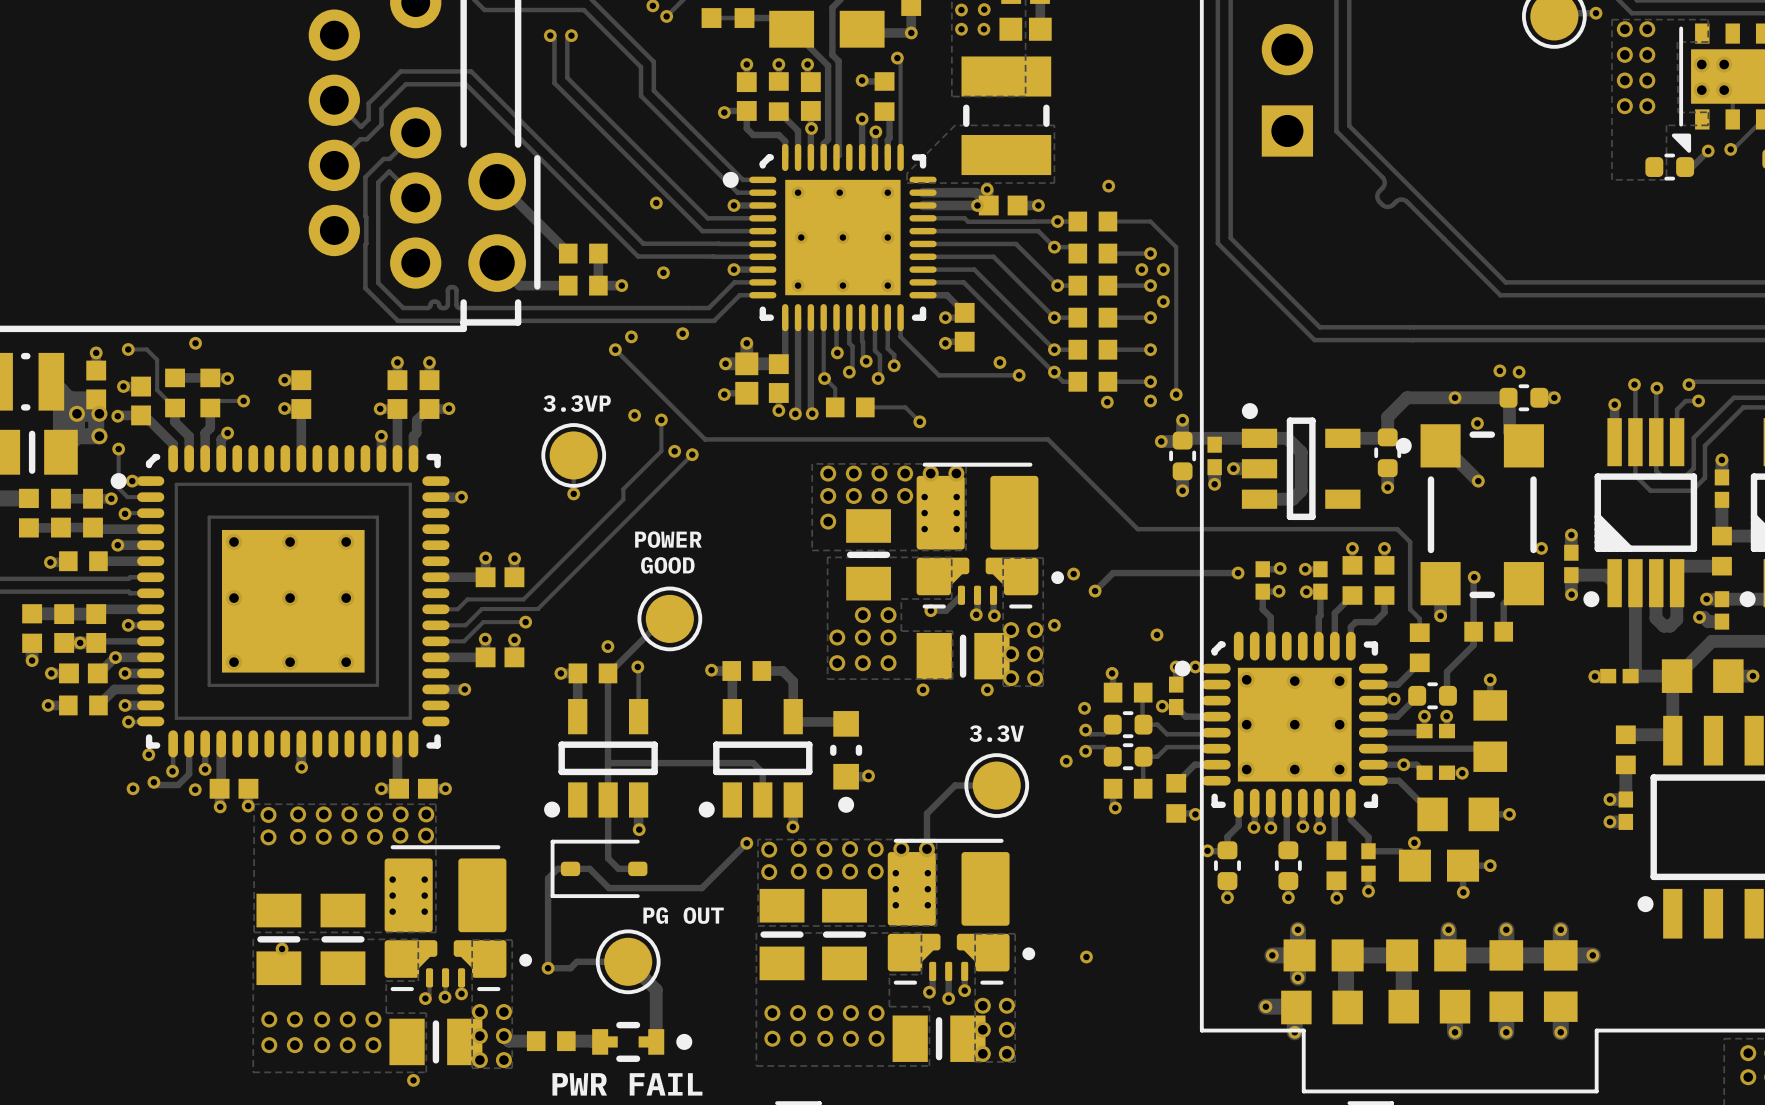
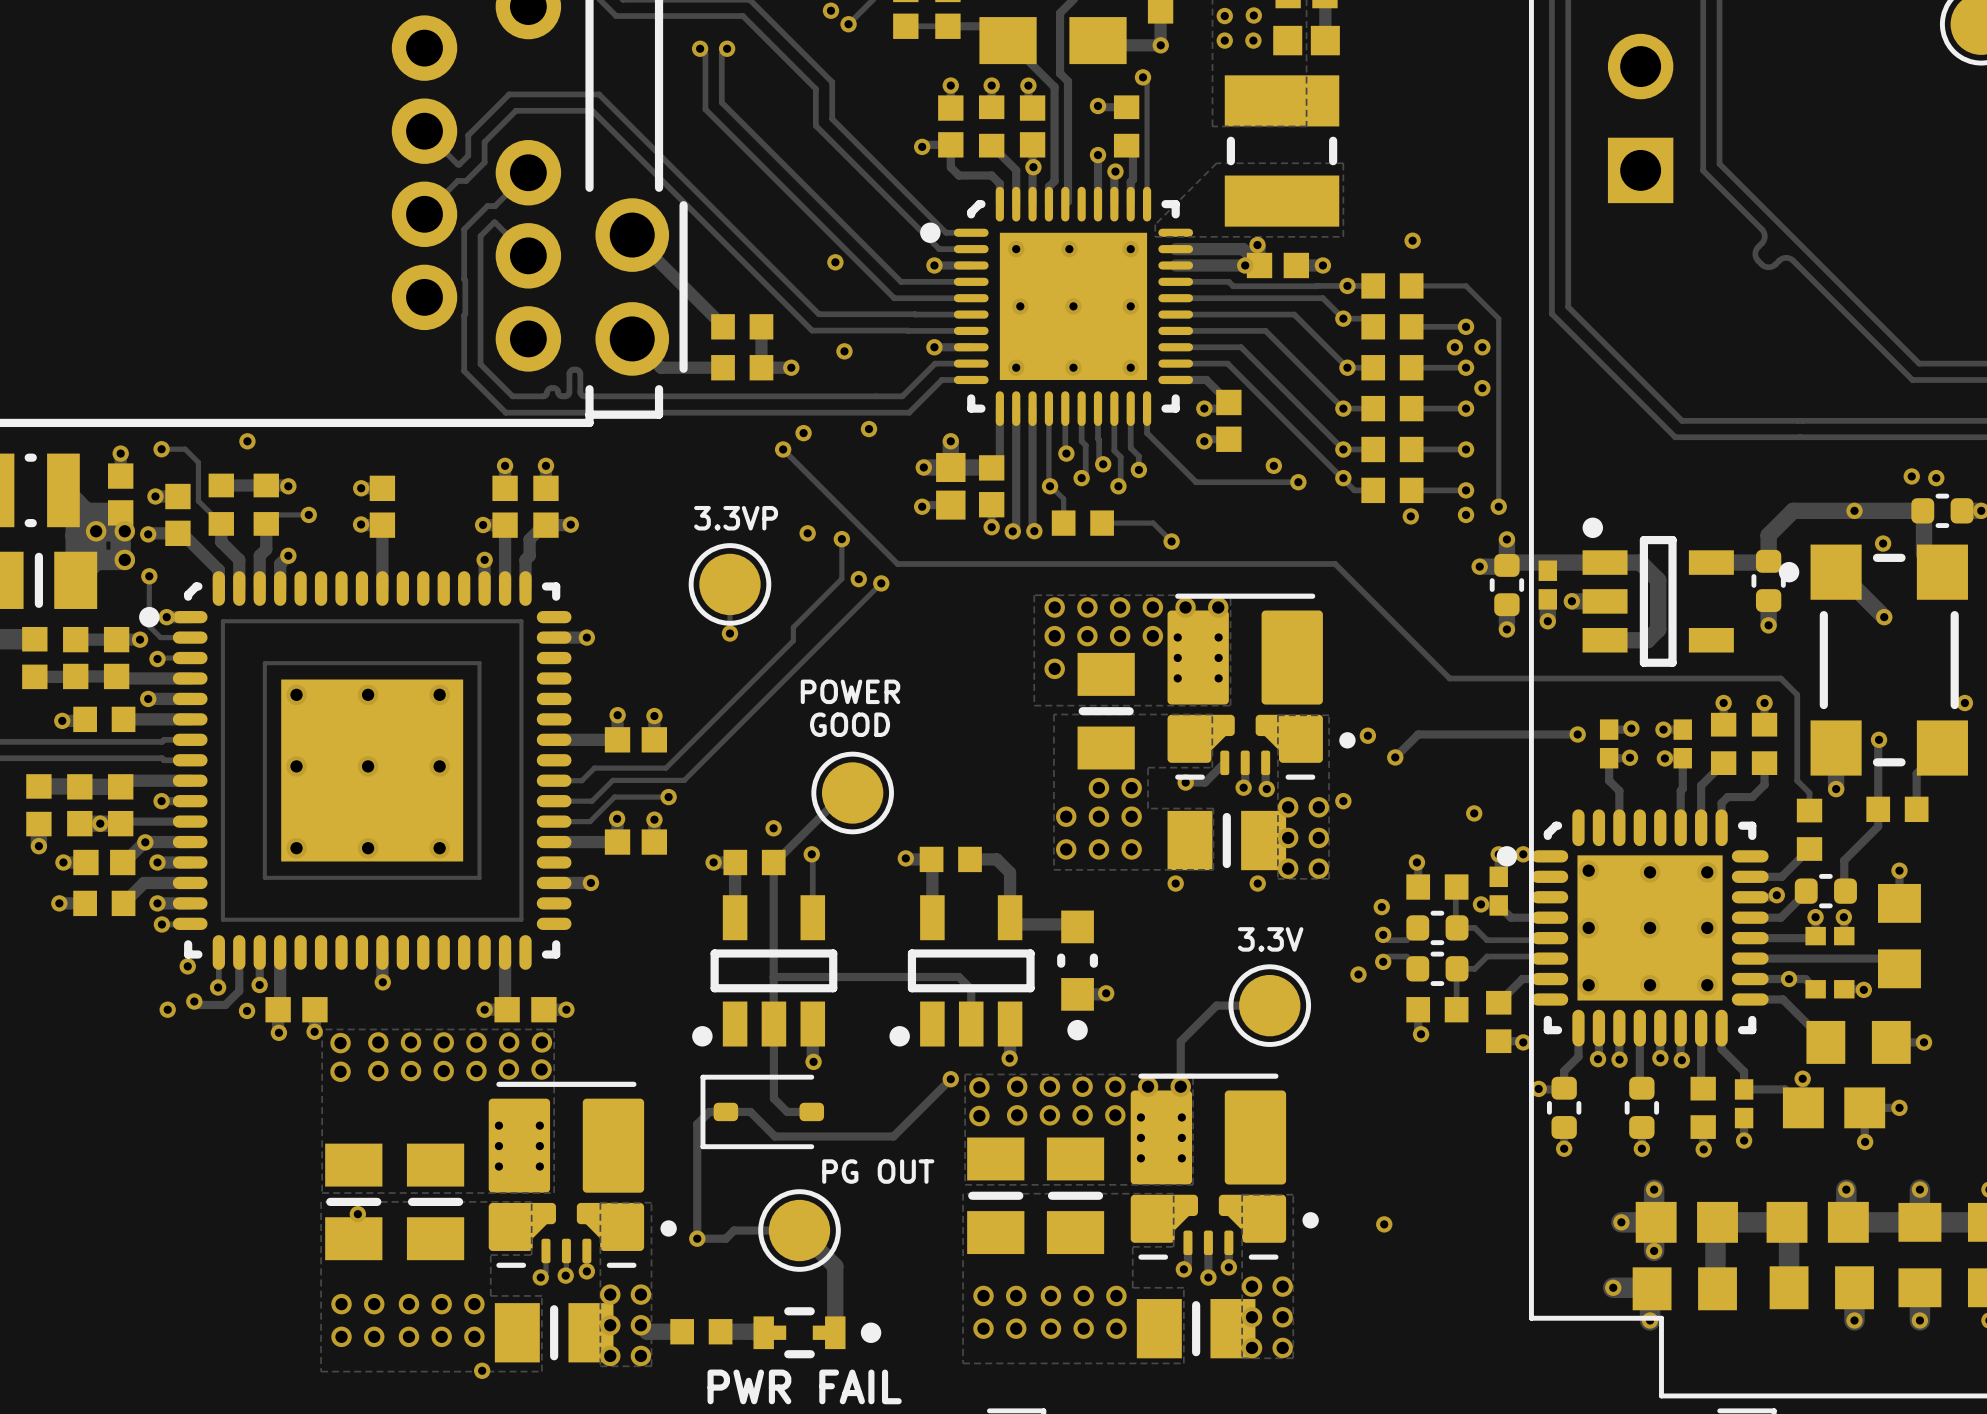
via position: (413, 1080) -> (482, 1370)

